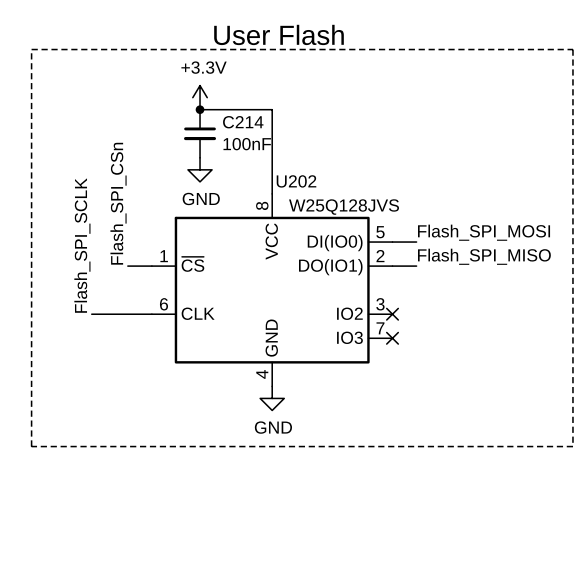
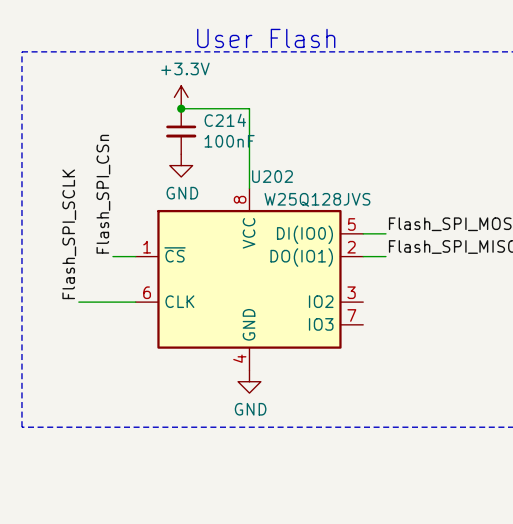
no-connect mark: (392, 314) -> none
no-connect mark: (392, 338) -> none

